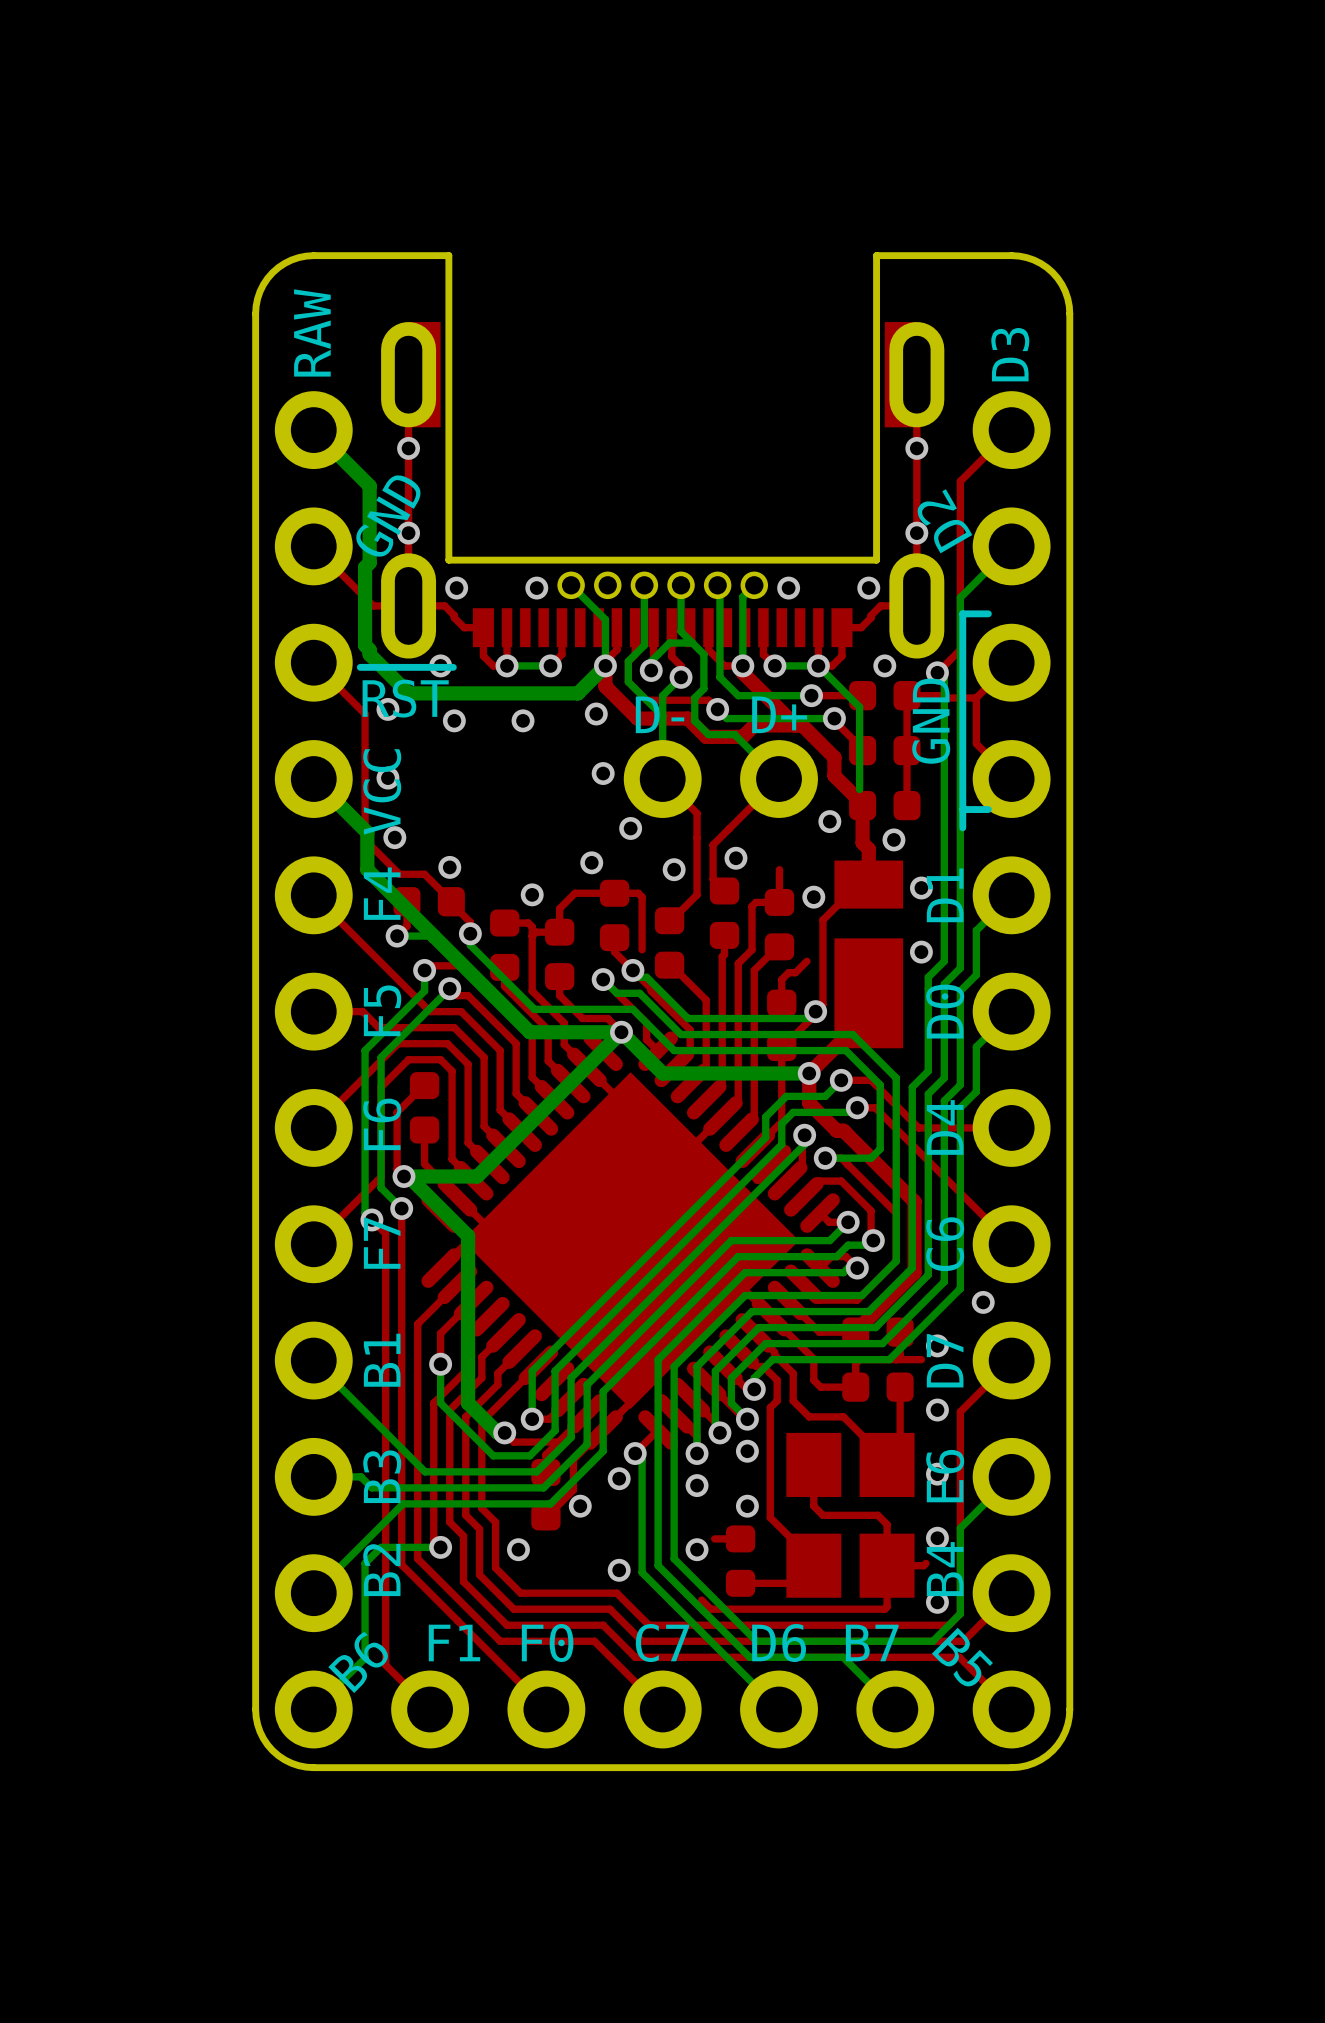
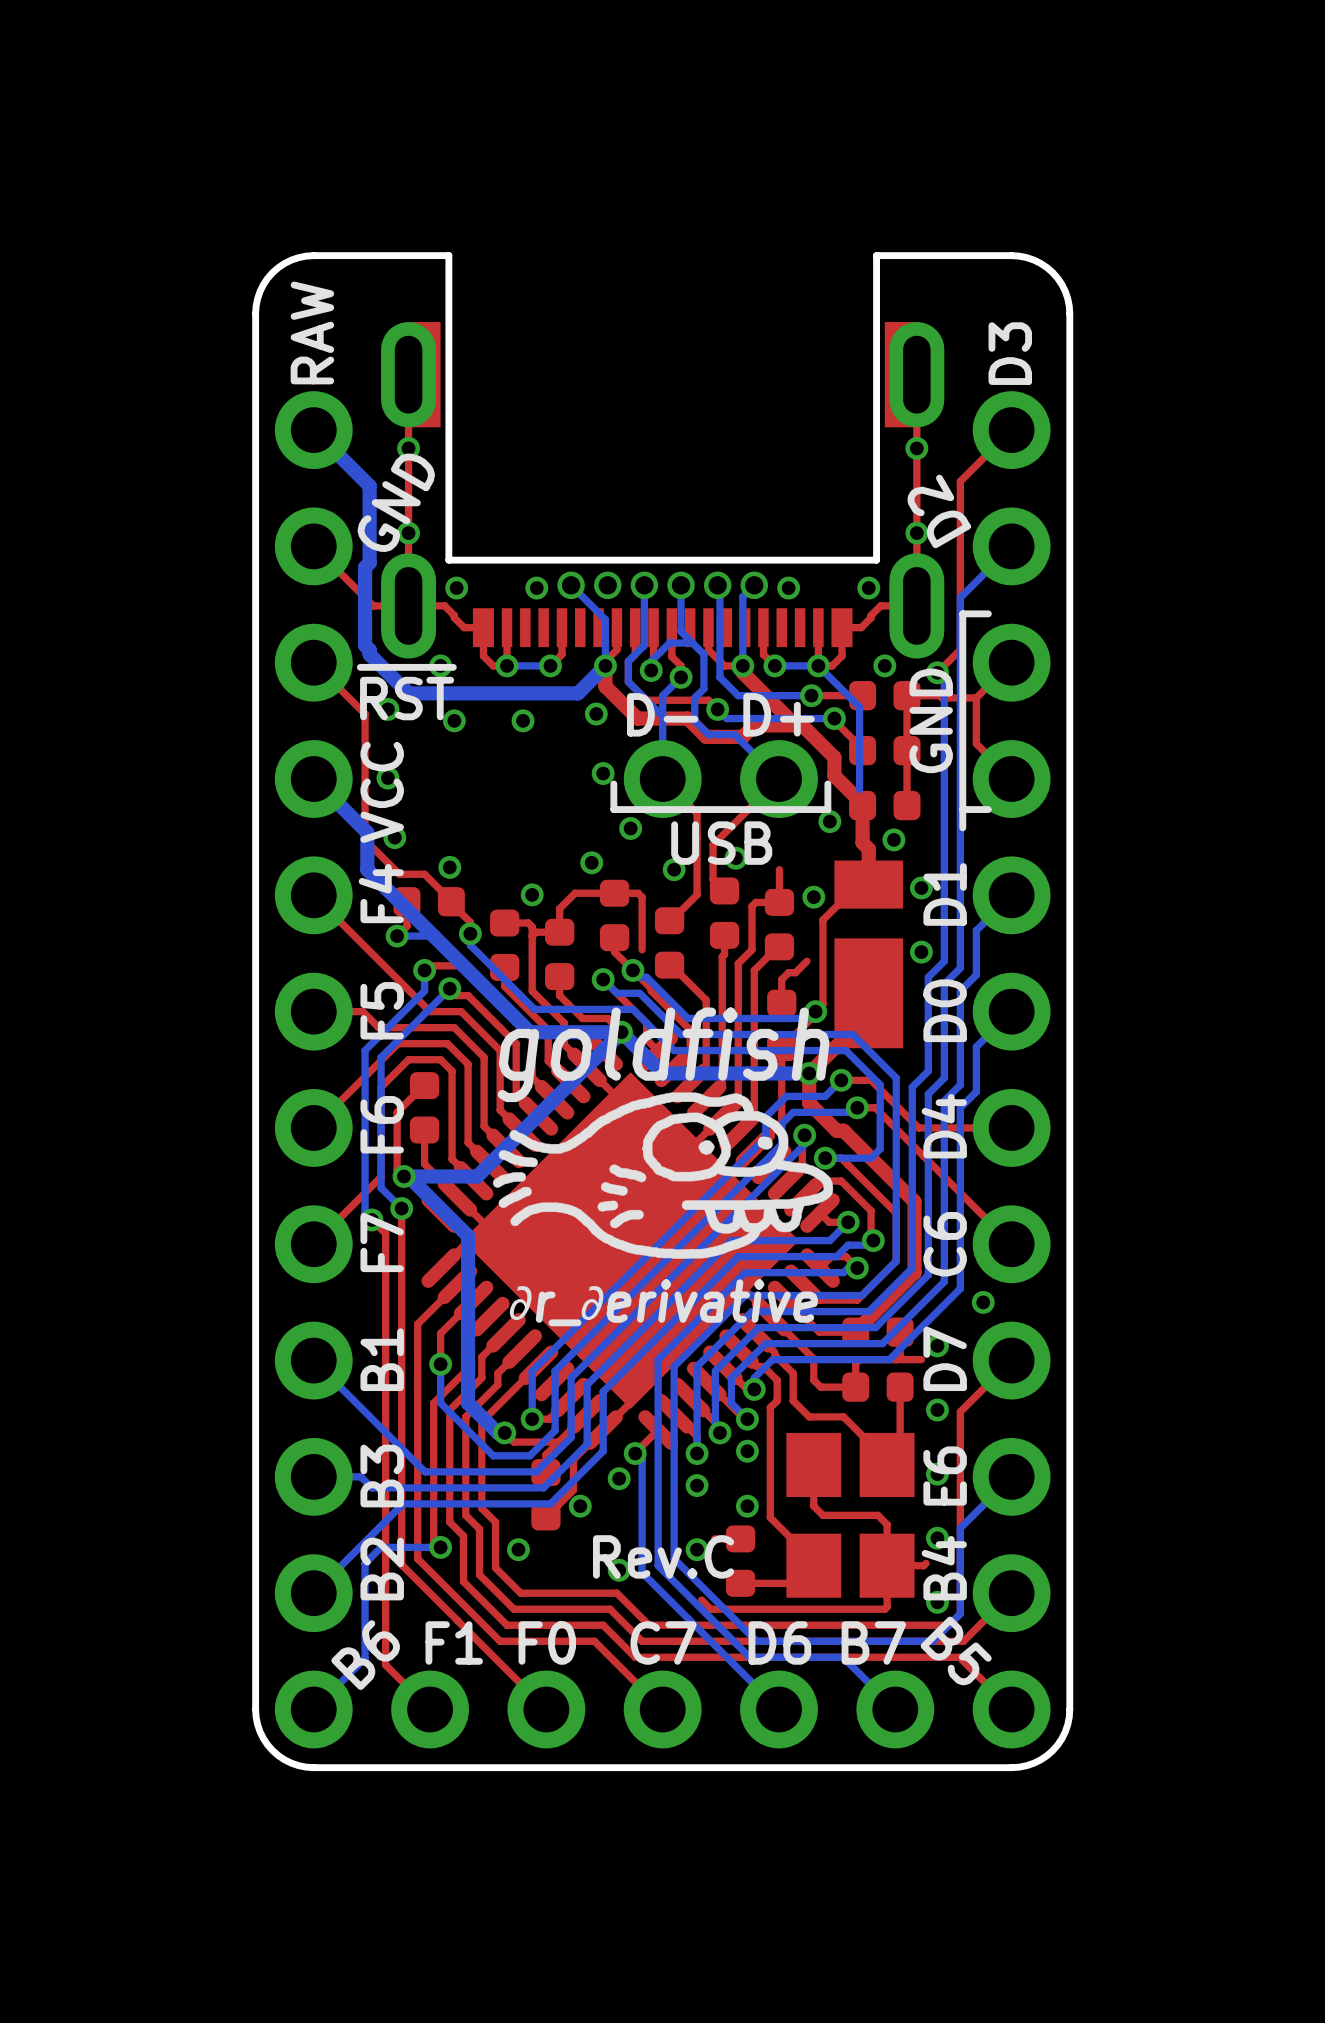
line: none -> (827, 783) (827, 809) (613, 809) (613, 783)
text: none -> USB (721, 843)
text: none -> goldfish (663, 1054)
drawing: none -> [492, 1092, 834, 1259]
text: none -> ∂r_∂erivative (661, 1302)
text: none -> Rev.C (663, 1556)

